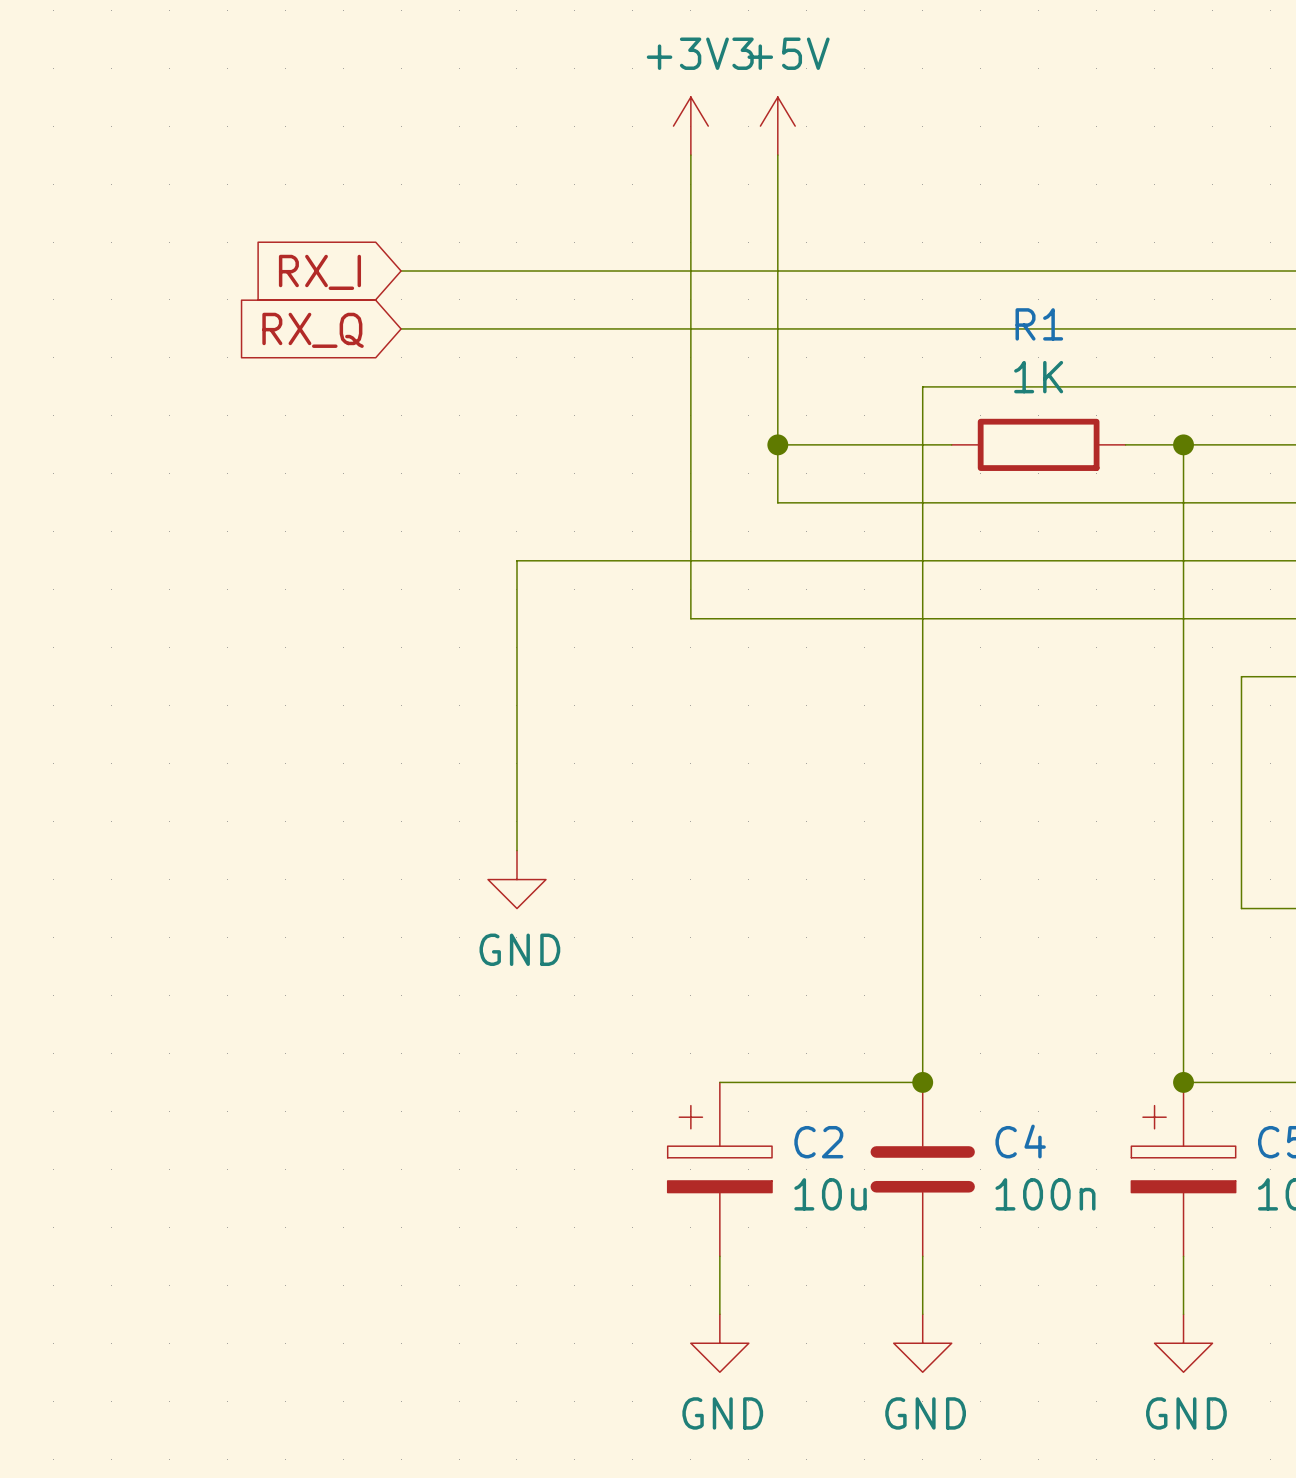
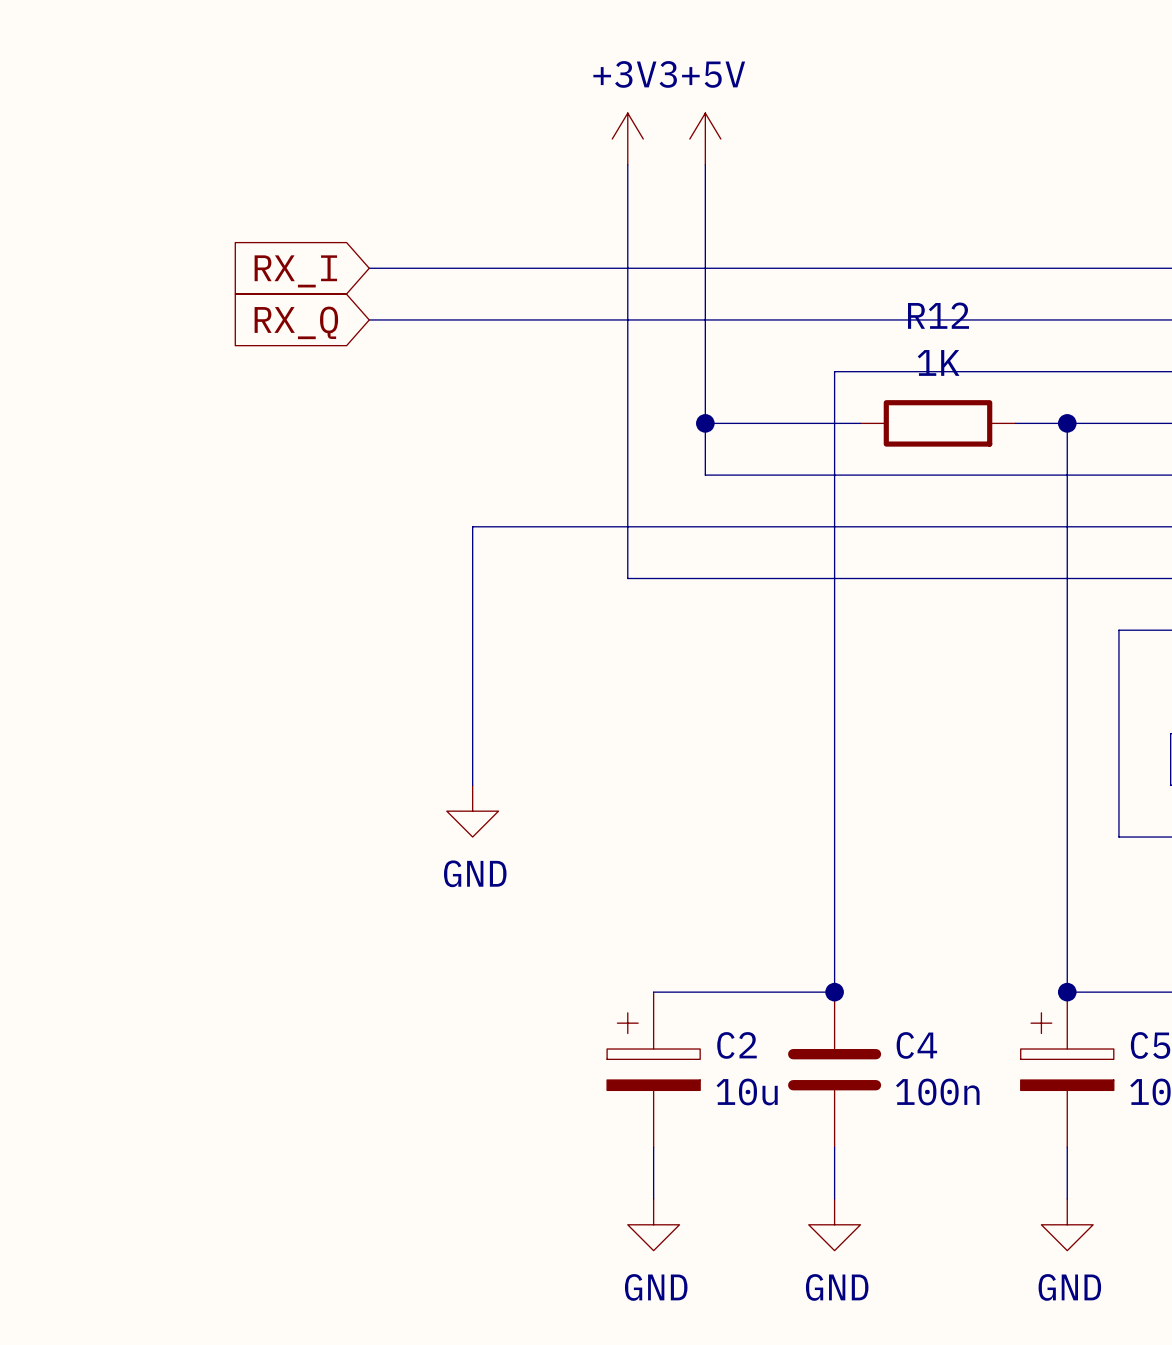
R1 name: R1 (1039, 324) -> R12 (938, 315)

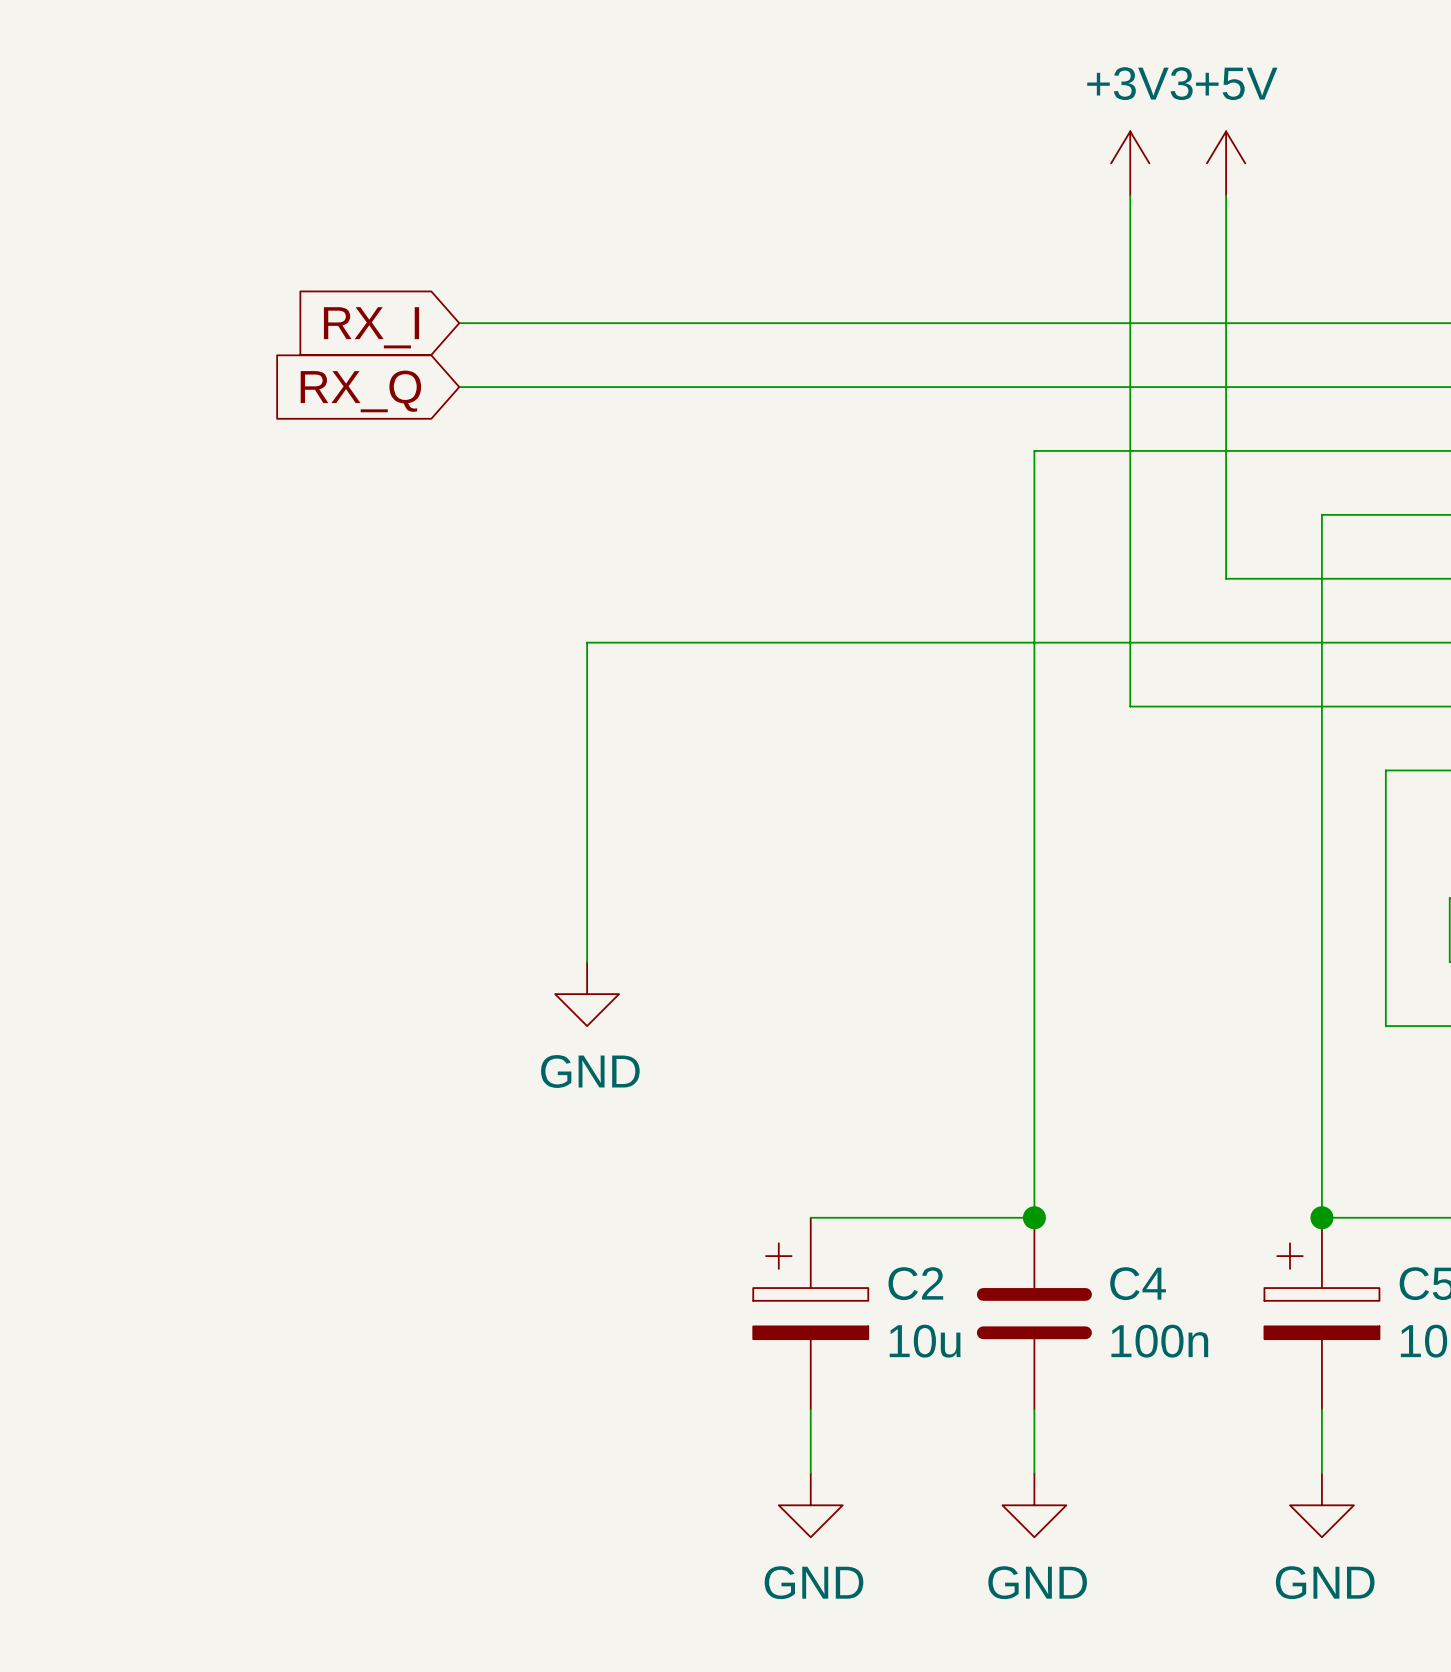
power symbol position: +3V3 (627, 139) -> +3V3 (1130, 163)
power symbol position: +5V (705, 139) -> +5V (1226, 163)
wire: (627, 164) (627, 578) (912, 578) -> (1130, 195) (1130, 706)
wire: (705, 164) (705, 475) (989, 475) -> (1226, 195) (1226, 578)
wire: (705, 423) (860, 423) -> none
junction: (705, 423) -> none
R12: 1K (938, 423) -> none
wire: (1015, 423) (1067, 423) -> none
junction: (1067, 423) -> none

